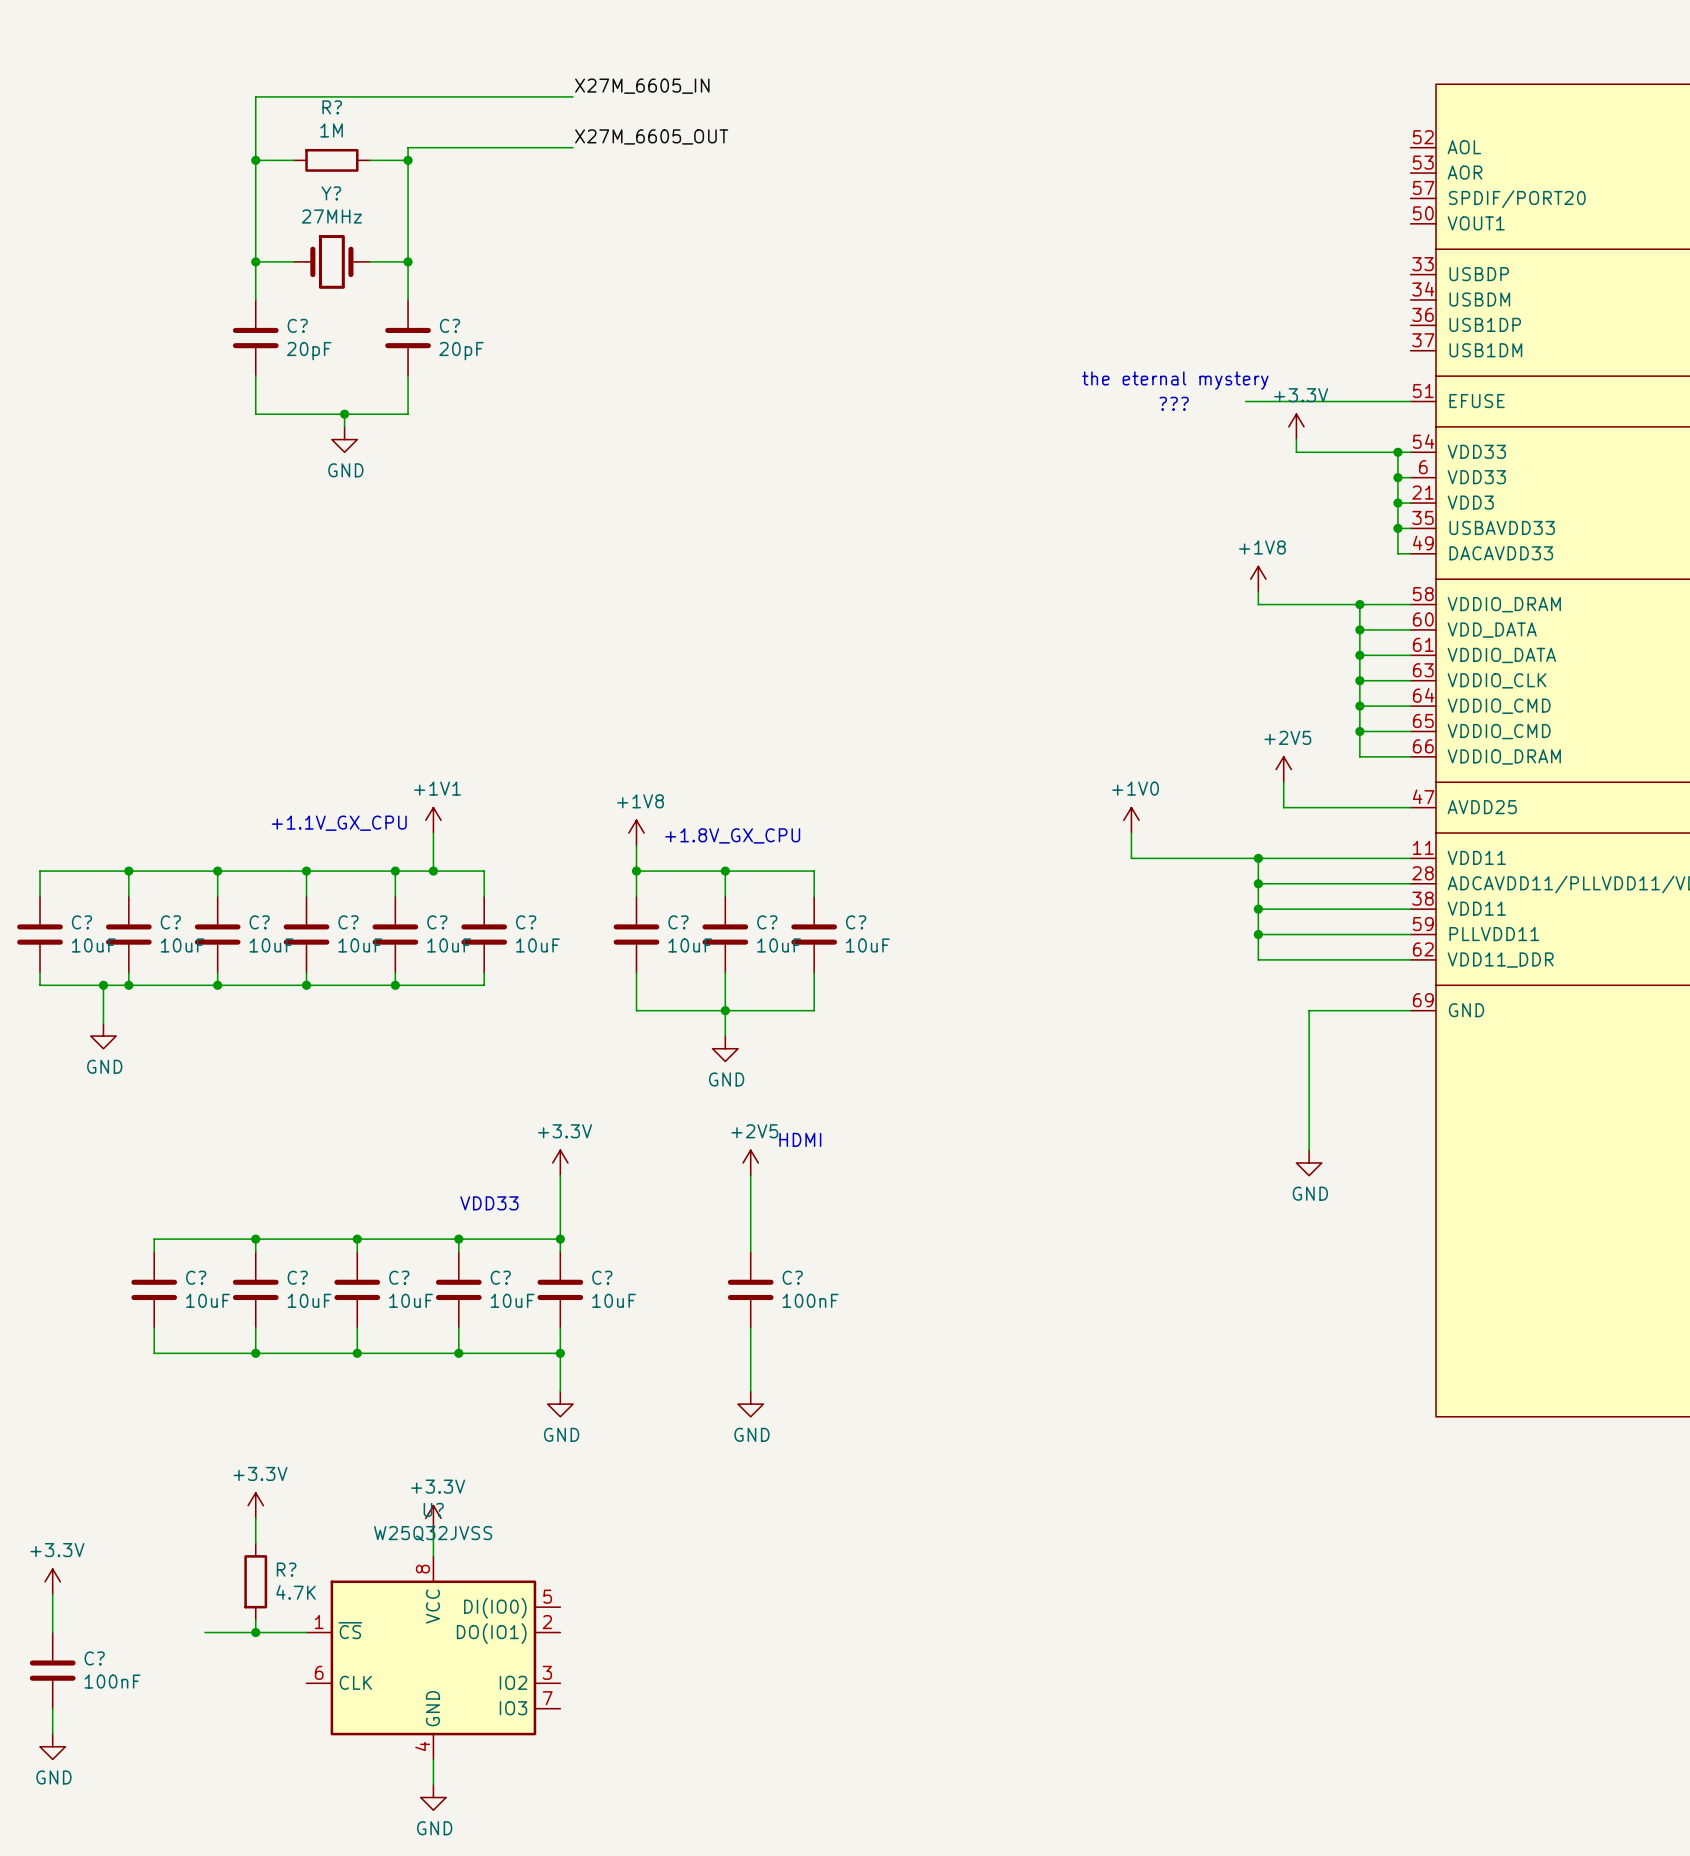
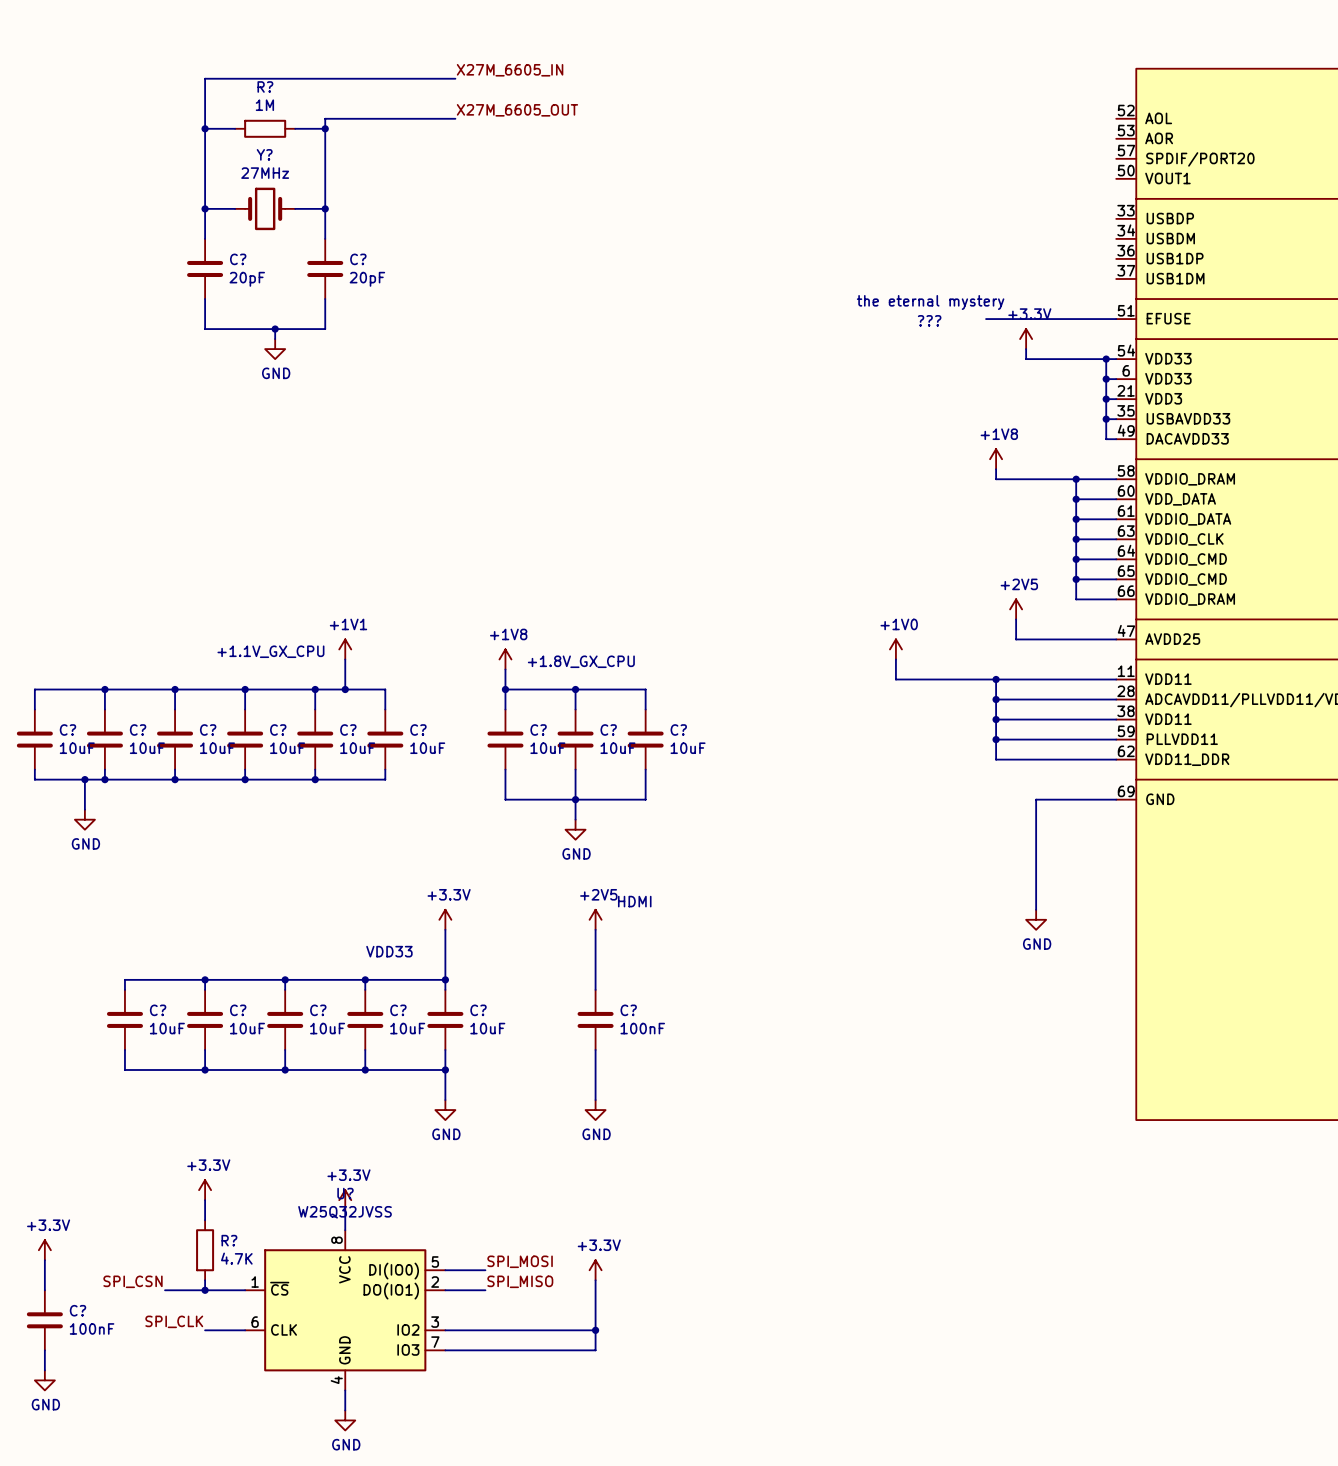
label: none -> SPI_MOSI (520, 1261)
wire: none -> (445, 1270) (485, 1270)
power symbol: none -> +3.3V (595, 1270)
wire: none -> (595, 1280) (595, 1350) (445, 1350)
label: none -> SPI_CSN (133, 1281)
label: none -> SPI_MISO (520, 1281)
wire: none -> (445, 1290) (485, 1290)
label: none -> SPI_CLK (174, 1321)
wire: none -> (205, 1330) (245, 1330)
wire: none -> (445, 1330) (595, 1330)
junction: none -> (595, 1330)

